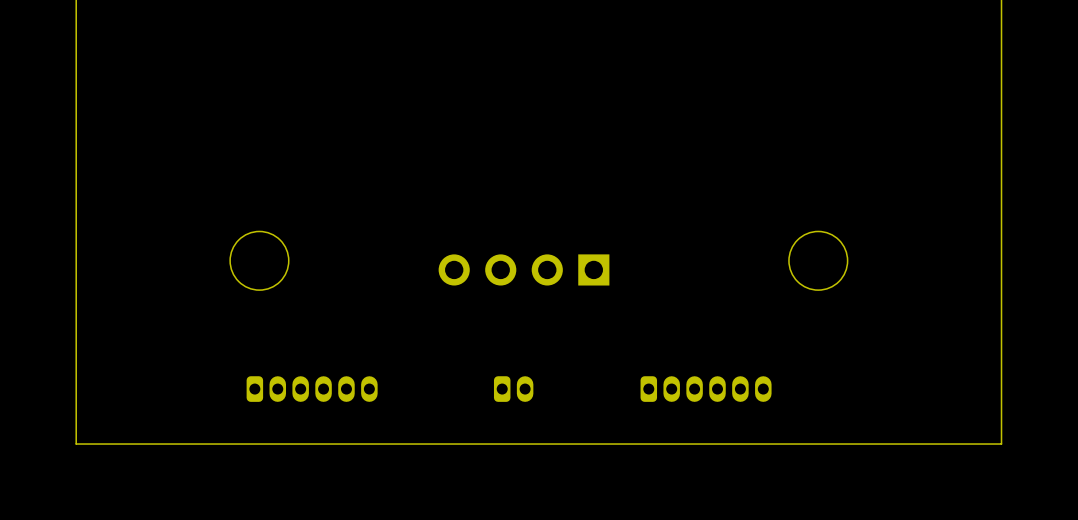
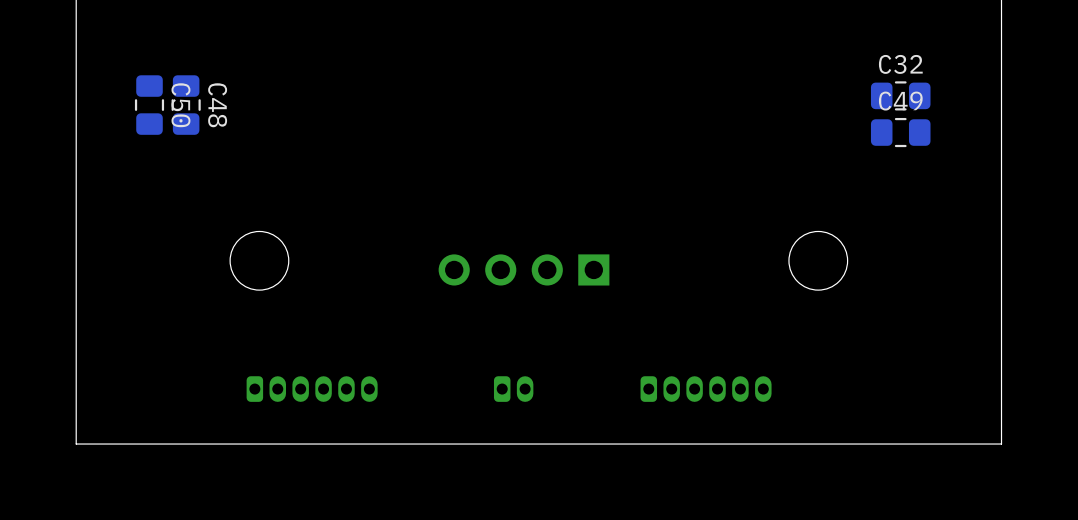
C32: none -> (900, 95)
C50: none -> (149, 105)
C48: none -> (186, 105)
C49: none -> (900, 132)

